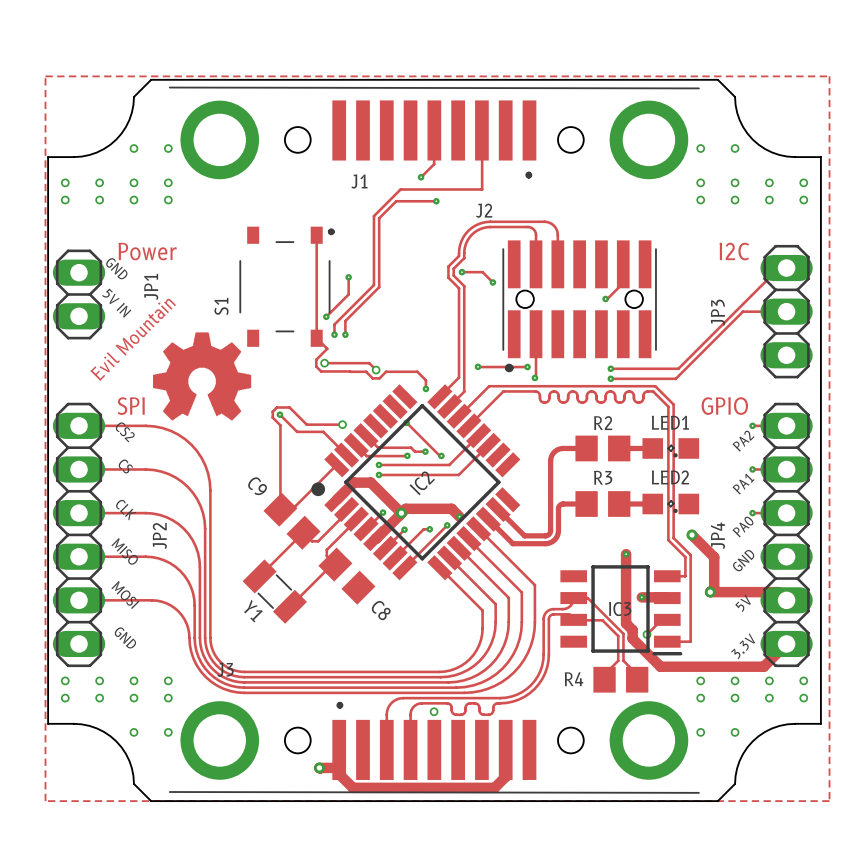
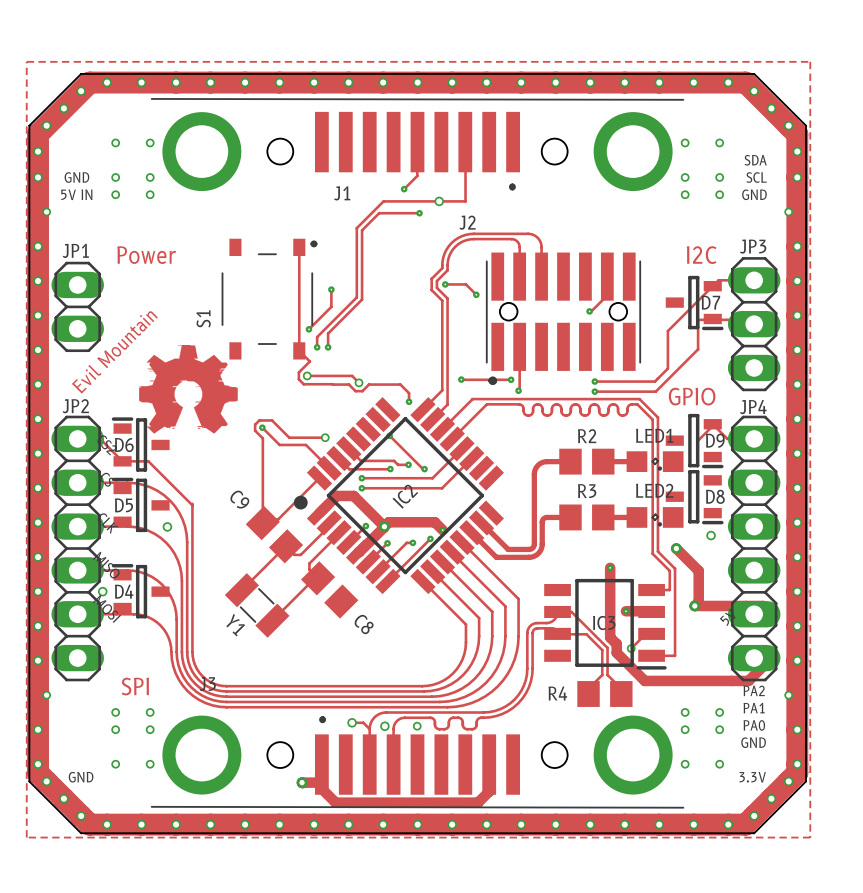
track: none -> (89, 82) (745, 82) (797, 134) (797, 772) (745, 824) (89, 824) (38, 772) (38, 134) (89, 82)
via: none -> (107, 82)
via: none -> (141, 82)
via: none -> (176, 82)
via: none -> (210, 82)
via: none -> (245, 82)
via: none -> (279, 82)
via: none -> (314, 82)
via: none -> (348, 82)
via: none -> (383, 82)
via: none -> (417, 82)
via: none -> (452, 82)
via: none -> (486, 82)
via: none -> (521, 82)
via: none -> (555, 82)
via: none -> (590, 82)
via: none -> (624, 82)
via: none -> (659, 82)
via: none -> (693, 82)
via: none -> (728, 82)
zone outline: (45, 76) (829, 76) (829, 801) (45, 801) -> (26, 87) (26, 61) (810, 61) (810, 837) (26, 837) (26, 815)
via: none -> (81, 91)
via: none -> (754, 91)
via: none -> (63, 108)
via: none -> (771, 108)
via: none -> (46, 125)
via: none -> (788, 125)
via: none -> (115, 142)
via: none -> (150, 142)
via: none -> (685, 142)
via: none -> (719, 142)
via: none -> (38, 151)
via: none -> (797, 151)
via: (133, 148) -> none
via: (168, 148) -> none
via: (700, 148) -> none
via: (735, 148) -> none
text: none -> SDA (755, 160)
board edge: (48, 157) (89, 155) (110, 144) (121, 133) (129, 119) (133, 96) (151, 79) (717, 79) (735, 96) (739, 119) (747, 133) (758, 144) (779, 155) (820, 157) -> (29, 168) (29, 125) (81, 73) (754, 73) (805, 125) (805, 168)
via: none -> (38, 177)
via: none -> (115, 177)
via: none -> (150, 177)
via: none -> (685, 177)
via: none -> (719, 177)
text: none -> SCL (756, 177)
via: none -> (797, 177)
via: (65, 182) -> none
via: (99, 182) -> none
text: none -> GND (754, 194)
via: (769, 182) -> none
via: (803, 182) -> none
via: none -> (439, 201)
via: (99, 200) -> none
via: (133, 200) -> none
via: (168, 200) -> none
via: (700, 200) -> none
via: (735, 200) -> none
via: (769, 200) -> none
via: none -> (38, 246)
via: none -> (797, 246)
text position: Power (147, 251) -> Power (146, 255)
text position: I2C (734, 251) -> I2C (701, 255)
via: none -> (38, 281)
text rotation: 0° (116, 268) -> 45° counterclockwise (76, 177)
text position: GND (116, 268) -> GND (76, 177)
track: (786, 268) (779, 268) (678, 368) (670, 368) -> (754, 280) (718, 280) (667, 331) (667, 368) (654, 381)
via: none -> (797, 281)
JP1 name rotation: 0° (151, 286) -> 90° clockwise (75, 250)
JP1 name position: JP1 (151, 286) -> JP1 (75, 250)
D7: none -> (694, 303)
JP1 position: (79, 294) -> (77, 306)
via: none -> (38, 315)
text rotation: 0° (116, 303) -> 45° counterclockwise (76, 194)
text position: 5V IN (116, 303) -> 5V IN (76, 194)
via: none -> (797, 315)
track: (786, 311) (742, 311) (675, 378) (671, 378) -> (754, 324) (749, 319) (698, 319) (698, 349) (655, 391)
JP3 position: (786, 311) -> (754, 324)
JP3 name rotation: 0° (717, 312) -> 90° clockwise (753, 246)
JP3 name position: JP3 (717, 312) -> JP3 (753, 246)
drawing: [153, 332, 252, 416] -> none
drawing: none -> [139, 345, 238, 429]
via: none -> (38, 350)
via: none -> (797, 350)
via: none -> (38, 384)
via: none -> (797, 384)
via: none -> (38, 419)
text position: SPI (131, 406) -> SPI (135, 686)
text position: GPIO (724, 406) -> GPIO (692, 396)
via: none -> (797, 419)
track: none -> (712, 424) (727, 438) (737, 438)
track: none -> (713, 425) (698, 440)
track: (118, 425) (162, 428) (185, 439) (197, 451) (205, 465) (210, 490) -> (100, 438) (122, 461) (148, 461) (192, 505)
via: (752, 425) -> none
D9: none -> (694, 441)
D6: none -> (140, 444)
via: none -> (38, 453)
via: none -> (797, 453)
text rotation: 0° (743, 441) -> 45° clockwise (754, 690)
text position: PA2 (743, 441) -> PA2 (754, 690)
via: (752, 469) -> none
via: none -> (38, 488)
via: none -> (797, 488)
D8: none -> (694, 497)
text rotation: 0° (743, 484) -> 45° clockwise (754, 708)
text position: PA1 (743, 484) -> PA1 (754, 708)
D5: none -> (140, 504)
via: none -> (38, 522)
via: none -> (797, 522)
via: none -> (167, 526)
via: (752, 513) -> none
via: none -> (711, 535)
text rotation: 0° (742, 527) -> 45° clockwise (754, 725)
text position: PA0 (742, 527) -> PA0 (754, 725)
JP2 position: (79, 534) -> (77, 548)
JP4 position: (786, 534) -> (754, 548)
JP2 name rotation: 0° (159, 535) -> 90° clockwise (75, 406)
JP2 name position: JP2 (159, 535) -> JP2 (75, 406)
JP4 name rotation: 0° (717, 535) -> 90° clockwise (753, 407)
JP4 name position: JP4 (717, 535) -> JP4 (753, 407)
via: none -> (38, 557)
via: none -> (797, 557)
text rotation: 0° (743, 560) -> 45° clockwise (753, 742)
text position: GND (743, 560) -> GND (753, 742)
via: none -> (38, 591)
via: none -> (102, 591)
D4: none -> (140, 591)
via: none -> (797, 591)
via: none -> (38, 626)
via: none -> (797, 626)
text rotation: 0° (125, 637) -> 45° counterclockwise (81, 777)
text position: GND (125, 637) -> GND (81, 777)
via: none -> (38, 660)
text rotation: 0° (743, 646) -> 45° clockwise (752, 777)
text position: 3.3V (743, 646) -> 3.3V (752, 777)
via: none -> (797, 660)
via: (99, 680) -> none
via: (133, 680) -> none
via: (168, 680) -> none
via: (700, 680) -> none
via: (735, 680) -> none
via: (769, 680) -> none
via: (65, 698) -> none
via: (99, 698) -> none
track: (403, 698) (391, 702) (386, 714) -> (386, 712) (374, 717) (369, 729) (363, 722) (352, 722)
via: (769, 698) -> none
via: (803, 698) -> none
via: none -> (352, 722)
via: none -> (384, 726)
via: none -> (38, 729)
via: none -> (115, 729)
via: none -> (150, 729)
via: none -> (685, 729)
via: none -> (719, 729)
via: none -> (797, 729)
board edge: (48, 723) (89, 725) (110, 736) (121, 747) (129, 760) (133, 783) (151, 801) (717, 801) (735, 783) (739, 760) (747, 747) (758, 736) (779, 725) (820, 723) -> (29, 738) (29, 781) (81, 833) (754, 833) (805, 781) (805, 738)
via: (133, 732) -> none
via: (168, 732) -> none
via: (700, 732) -> none
via: (735, 732) -> none
via: none -> (38, 764)
via: none -> (115, 764)
via: none -> (150, 764)
via: none -> (685, 764)
via: none -> (719, 764)
via: none -> (797, 764)
via: none -> (46, 781)
via: none -> (788, 781)
via: none -> (63, 798)
via: none -> (771, 798)
via: none -> (81, 815)
via: none -> (754, 815)
via: none -> (107, 824)
via: none -> (141, 824)
via: none -> (176, 824)
via: none -> (210, 824)
via: none -> (245, 824)
via: none -> (279, 824)
via: none -> (314, 824)
via: none -> (348, 824)
via: none -> (383, 824)
via: none -> (417, 824)
via: none -> (452, 824)
via: none -> (486, 824)
via: none -> (521, 824)
via: none -> (555, 824)
via: none -> (590, 824)
via: none -> (624, 824)
via: none -> (659, 824)
via: none -> (693, 824)
via: none -> (728, 824)

